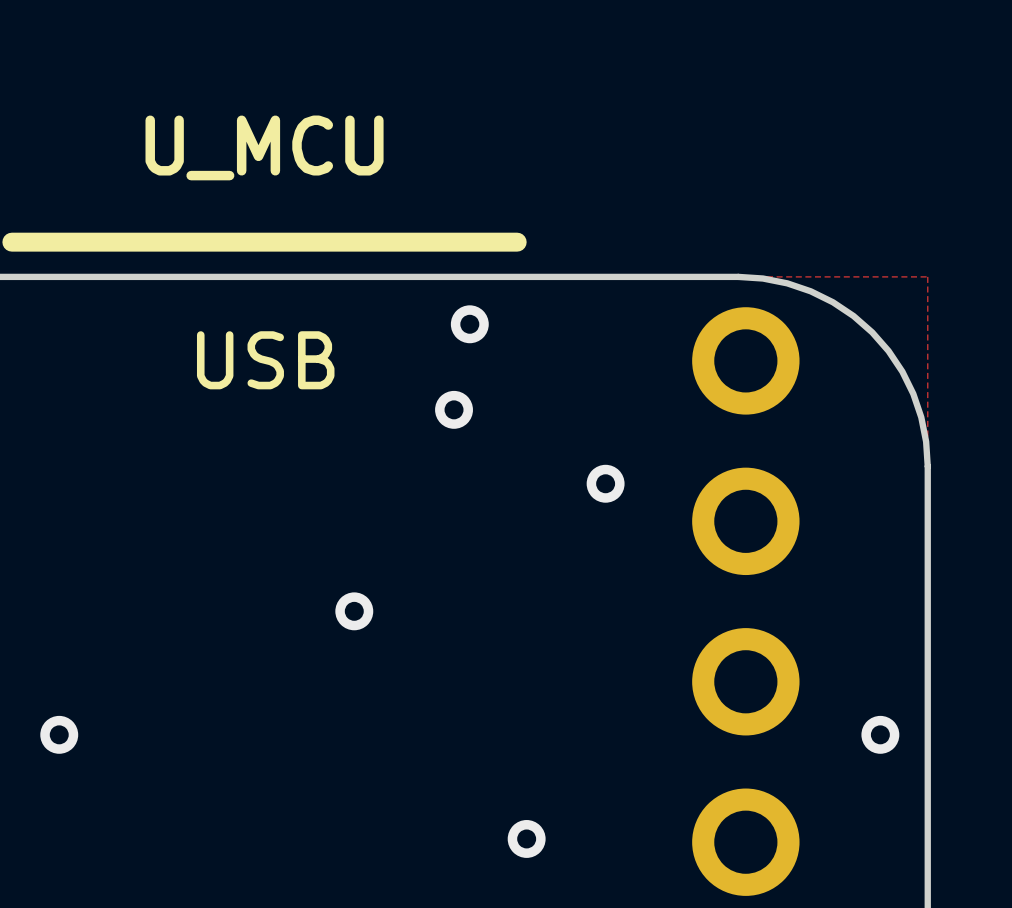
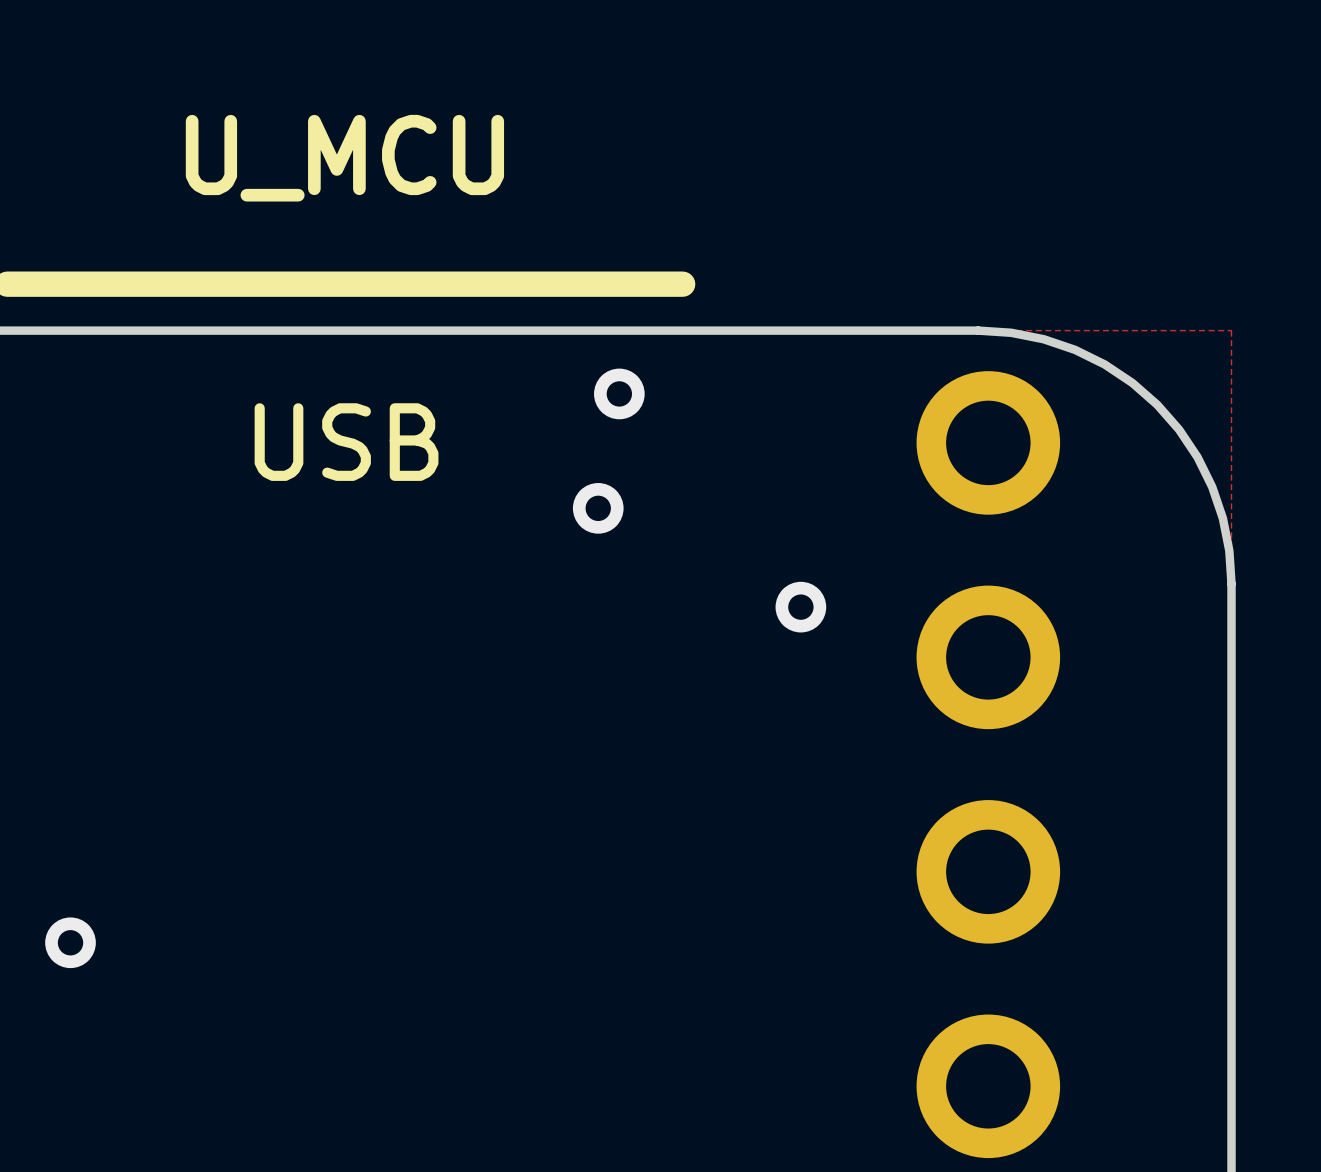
via: (354, 611) -> none
via: (880, 734) -> none
via: (526, 838) -> none

